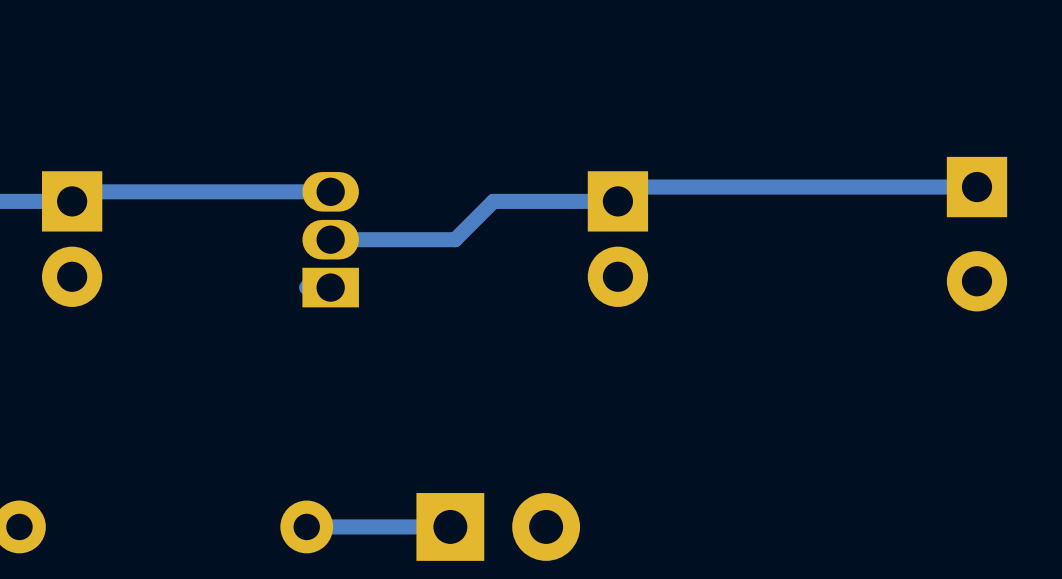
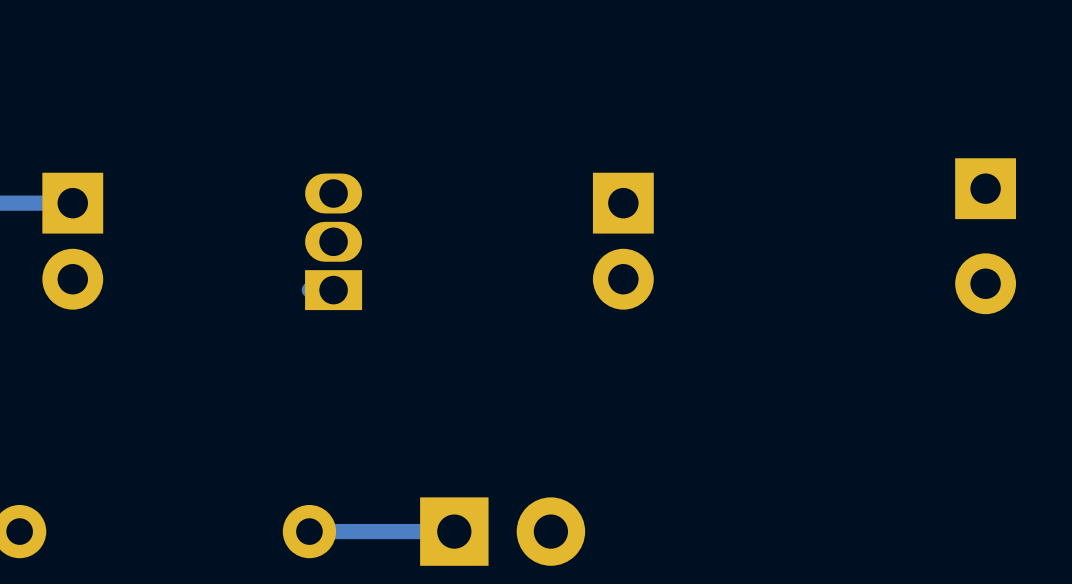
track: (976, 187) (632, 187) (617, 201) (493, 201) (455, 239) (330, 239) -> none
track: (330, 191) (81, 191) (72, 201) -> none

